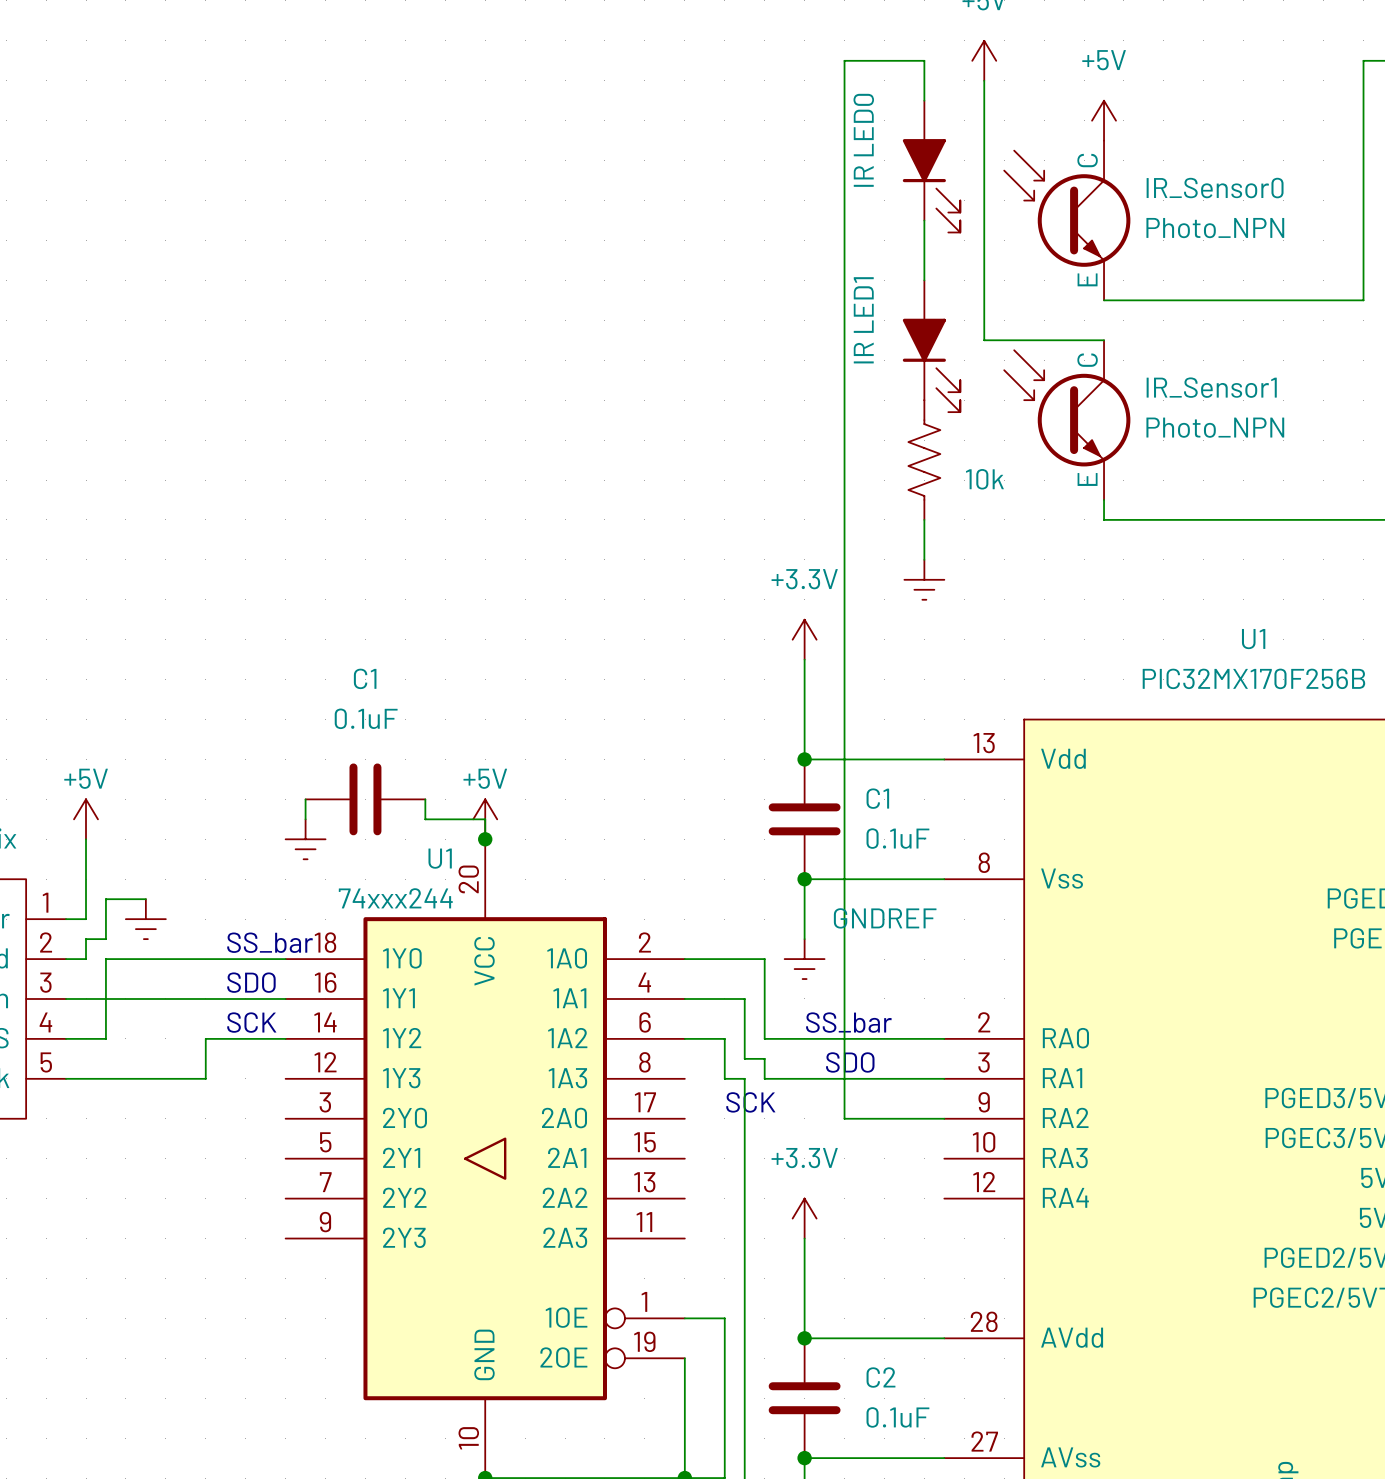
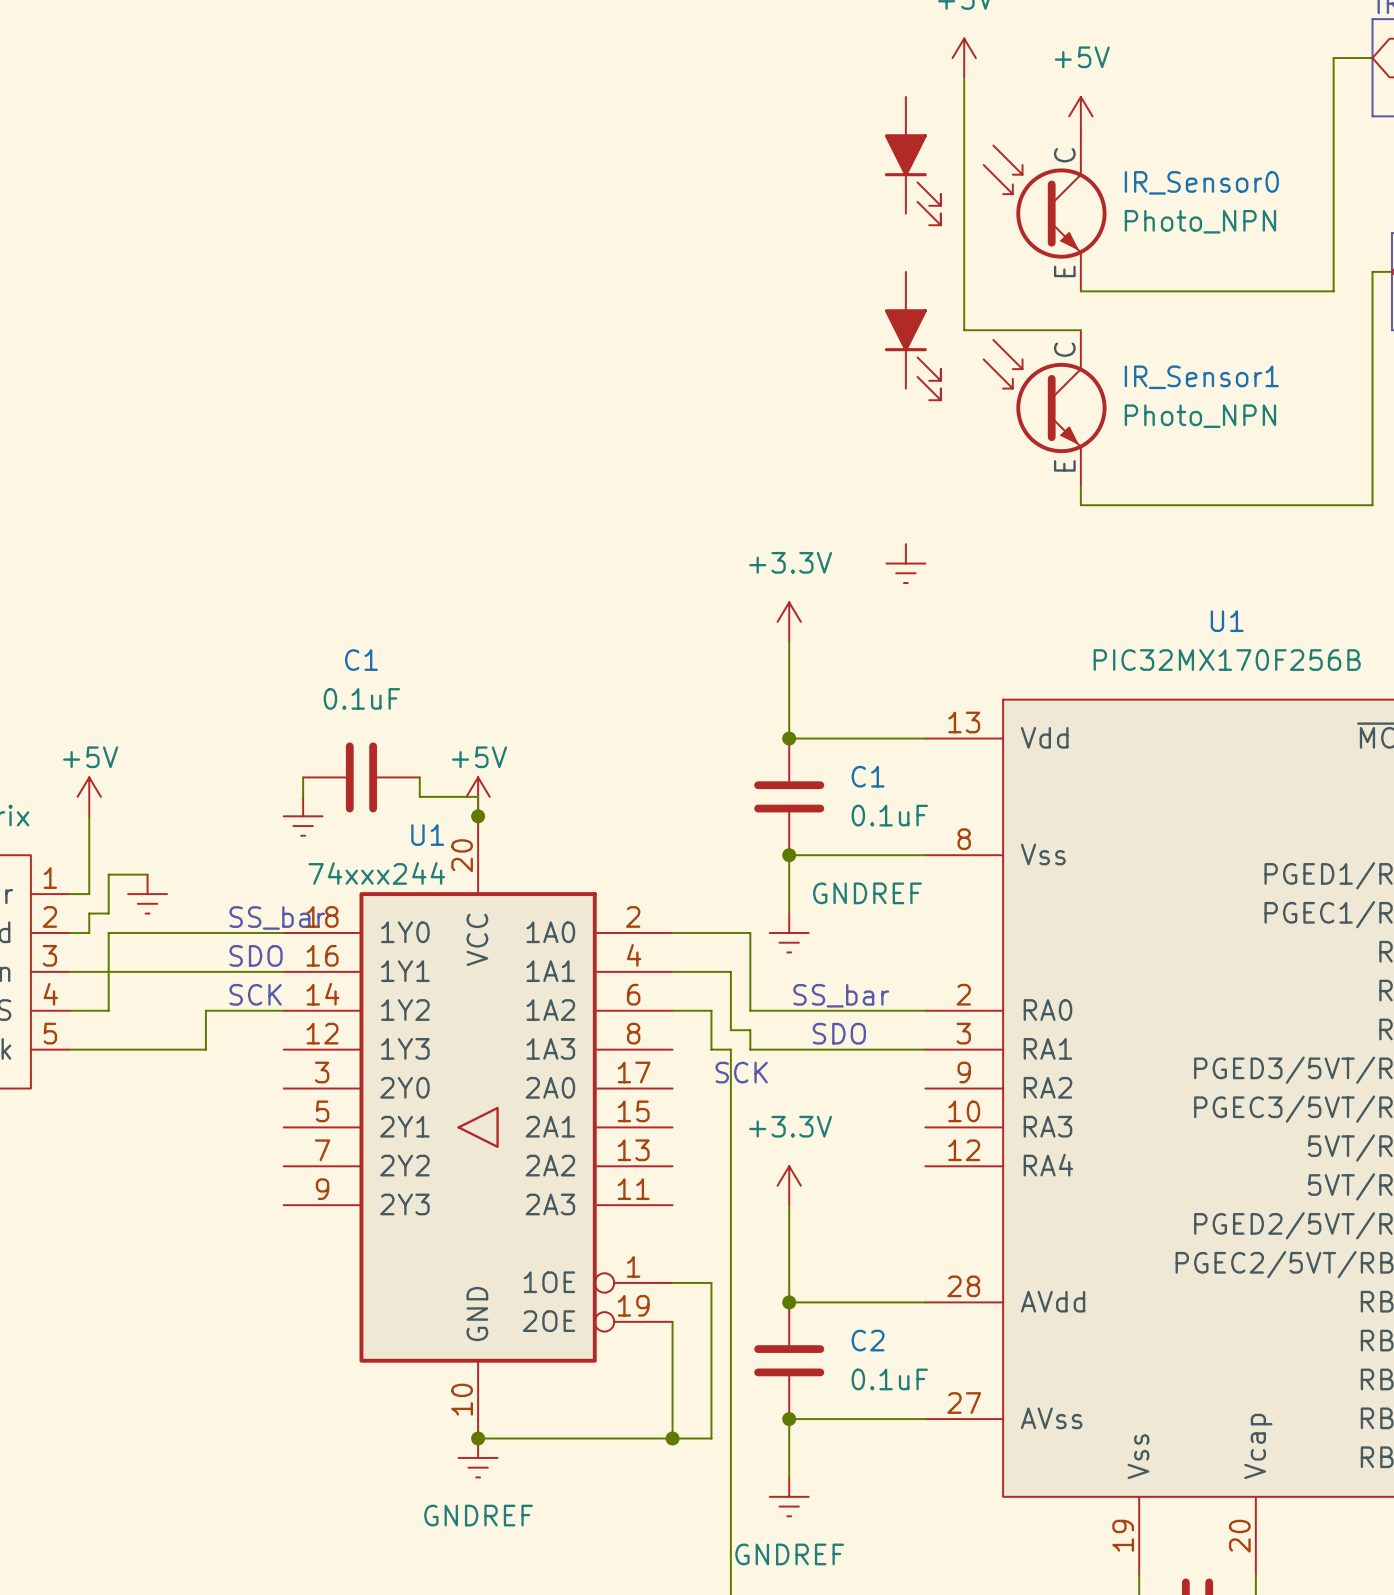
wire: (924, 100) (924, 60) (844, 60) (844, 1118) (944, 1118) -> none
part value: IR LED0 (863, 140) -> none
wire: (924, 220) (924, 280) -> none
part value: IR LED1 (863, 320) -> none
part: 10k (924, 460) -> none
wire: (924, 519) (924, 559) -> none

